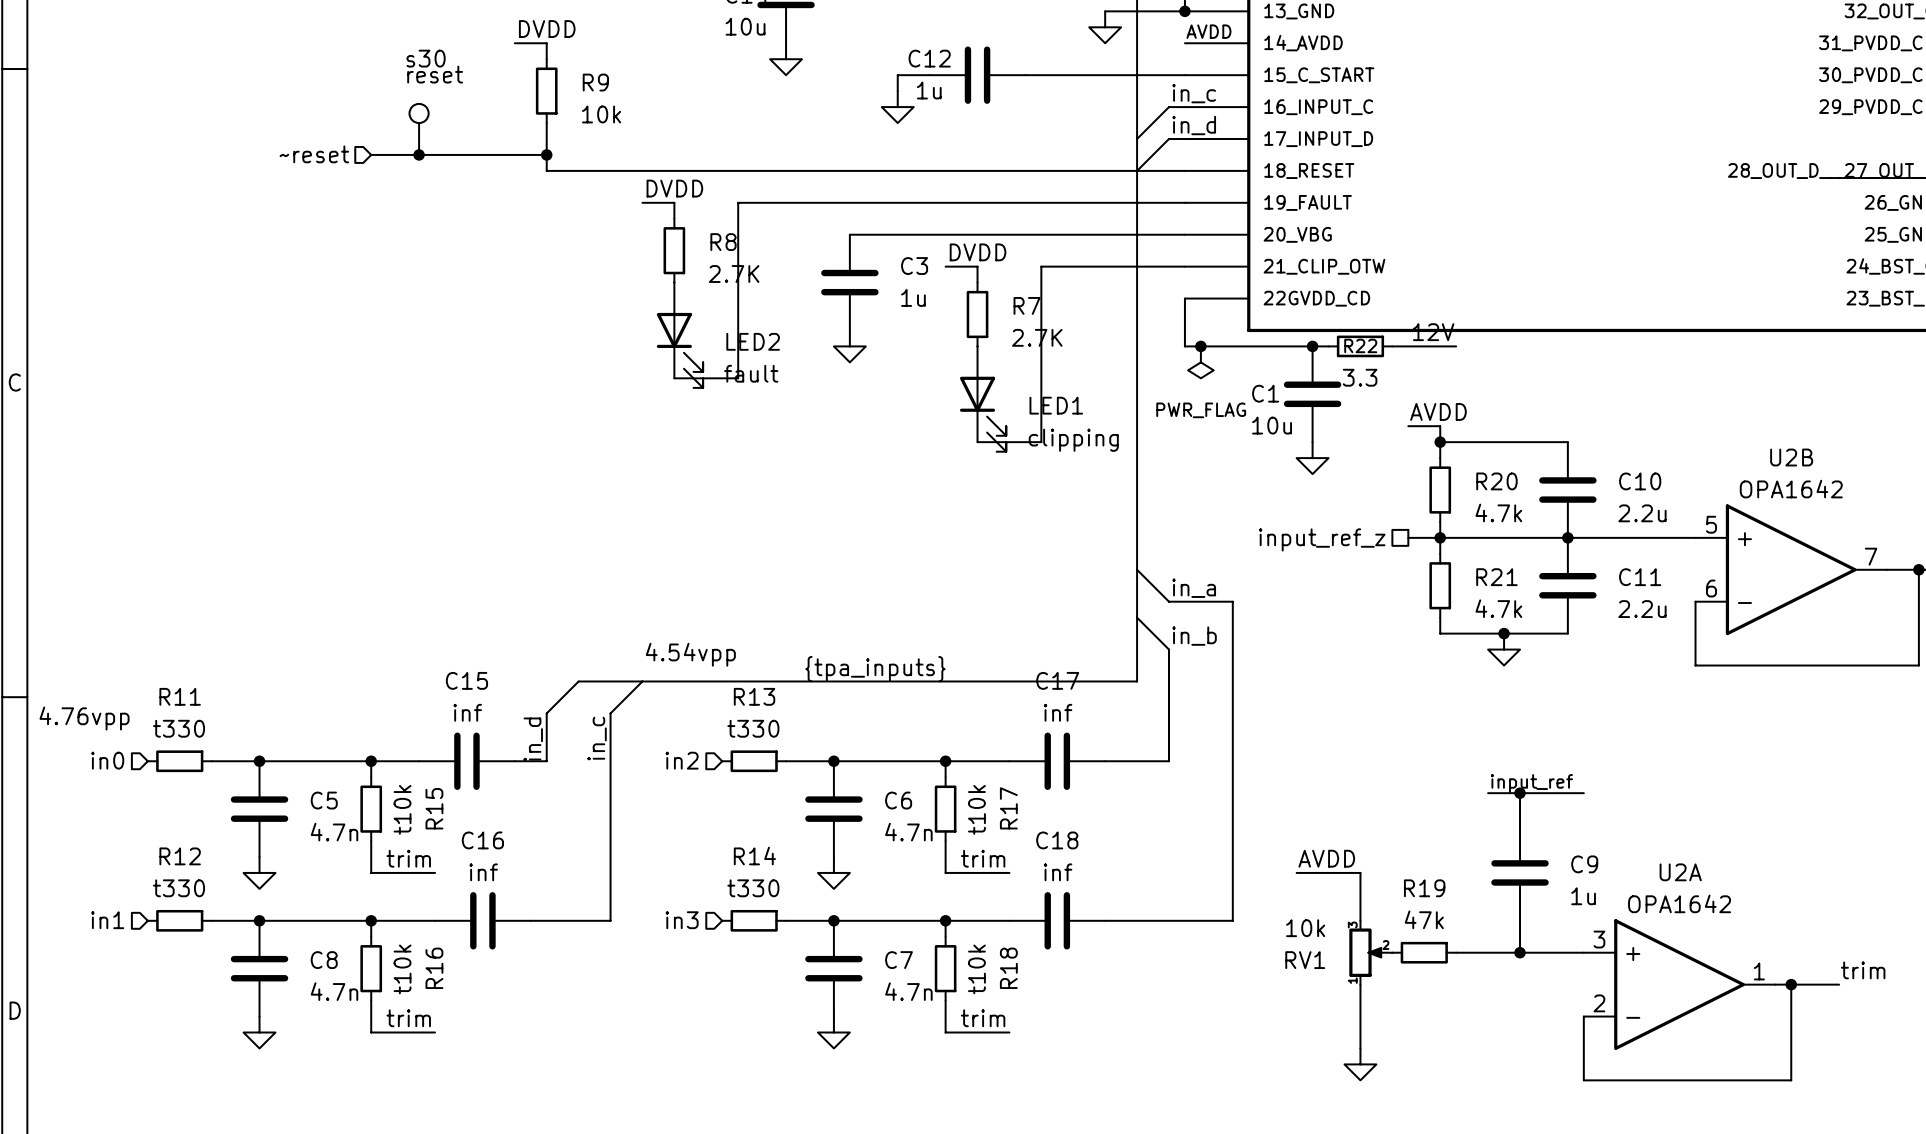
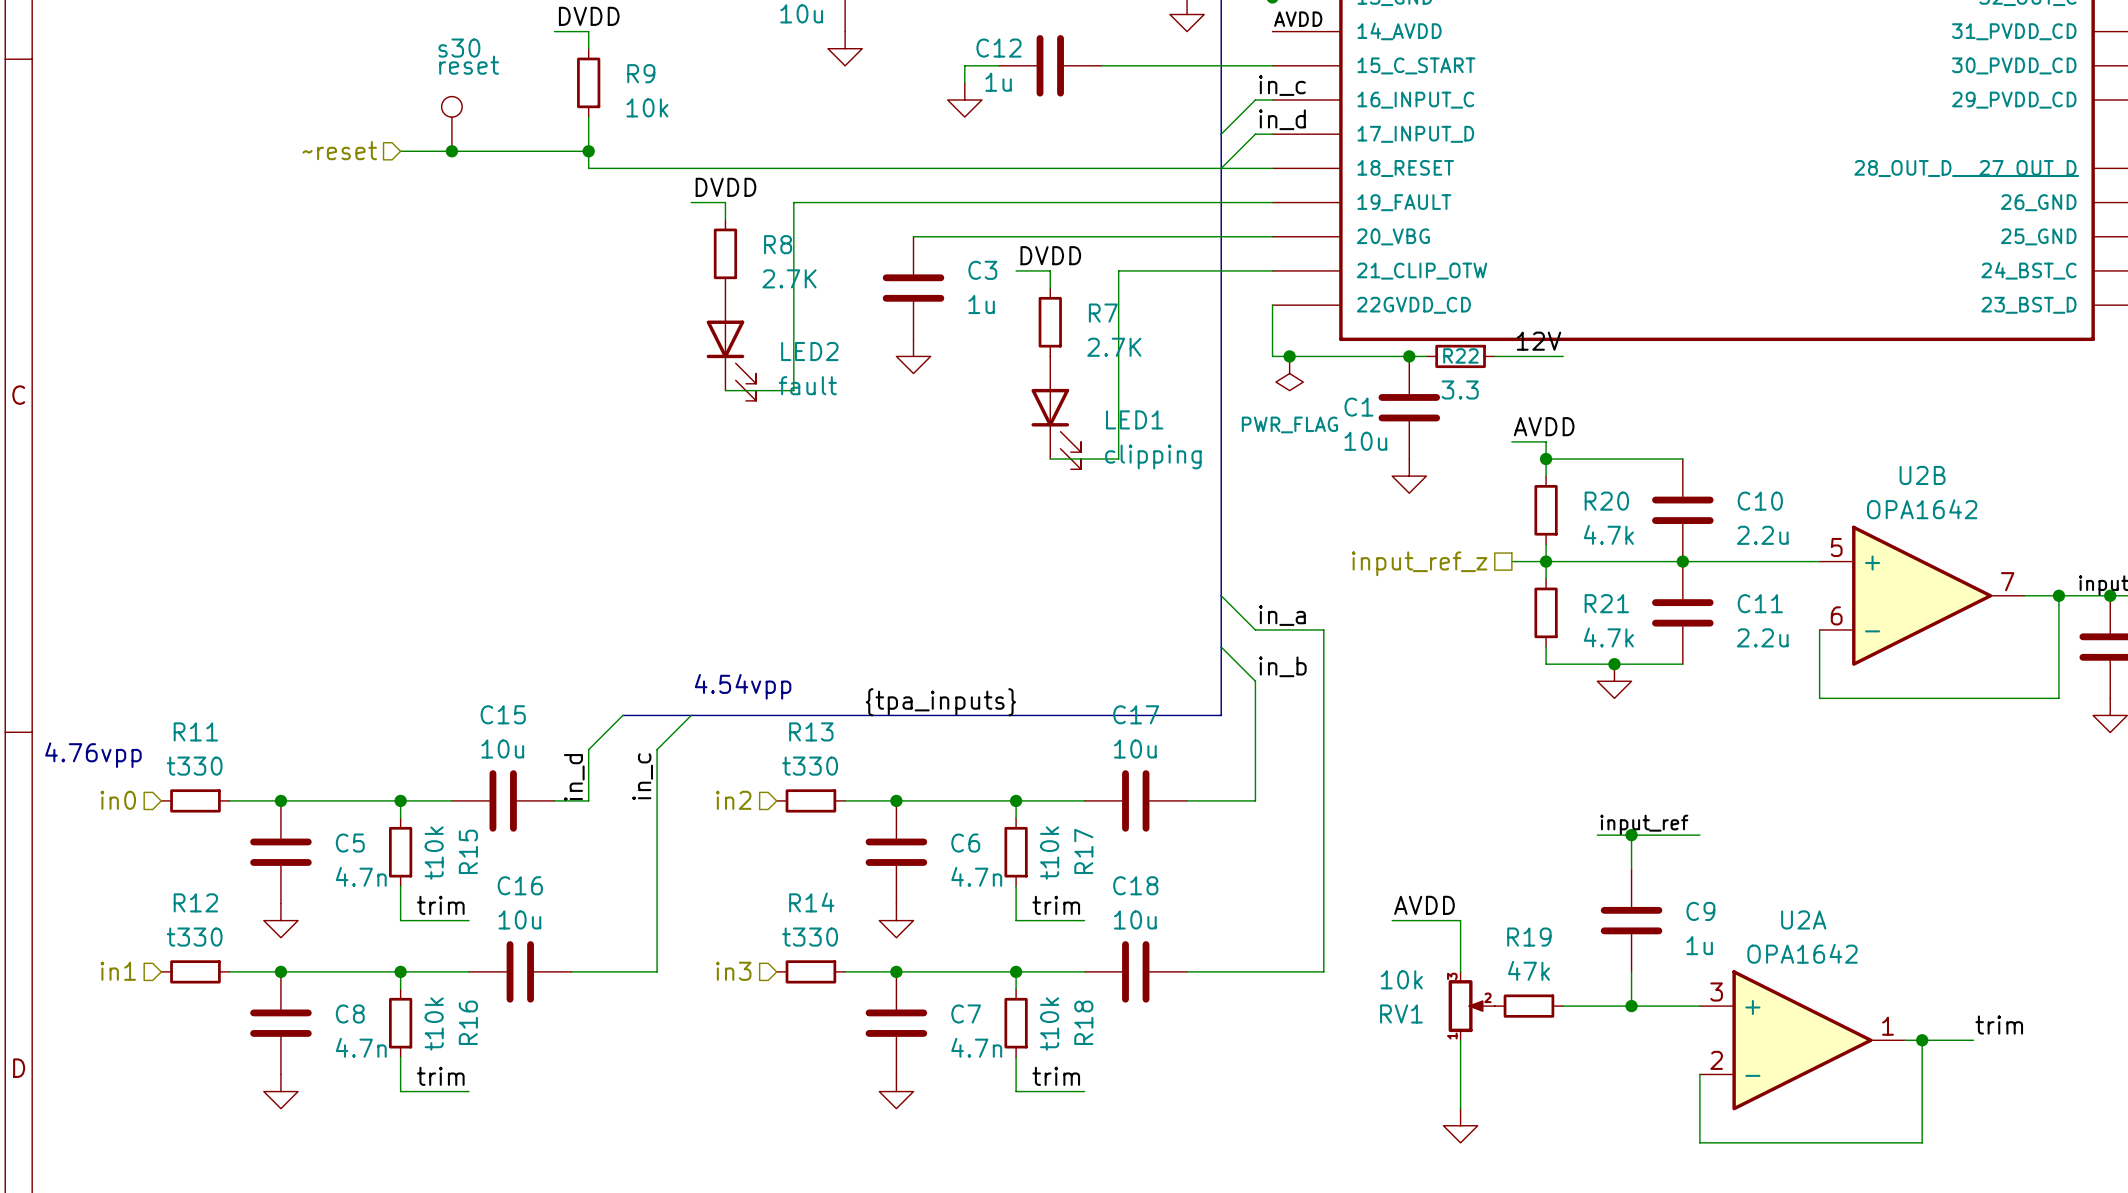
C15 value: inf (467, 712) -> 10u (502, 749)
C17 value: inf (1058, 712) -> 10u (1135, 749)
C16 value: inf (483, 872) -> 10u (519, 919)
C18 value: inf (1058, 872) -> 10u (1135, 919)

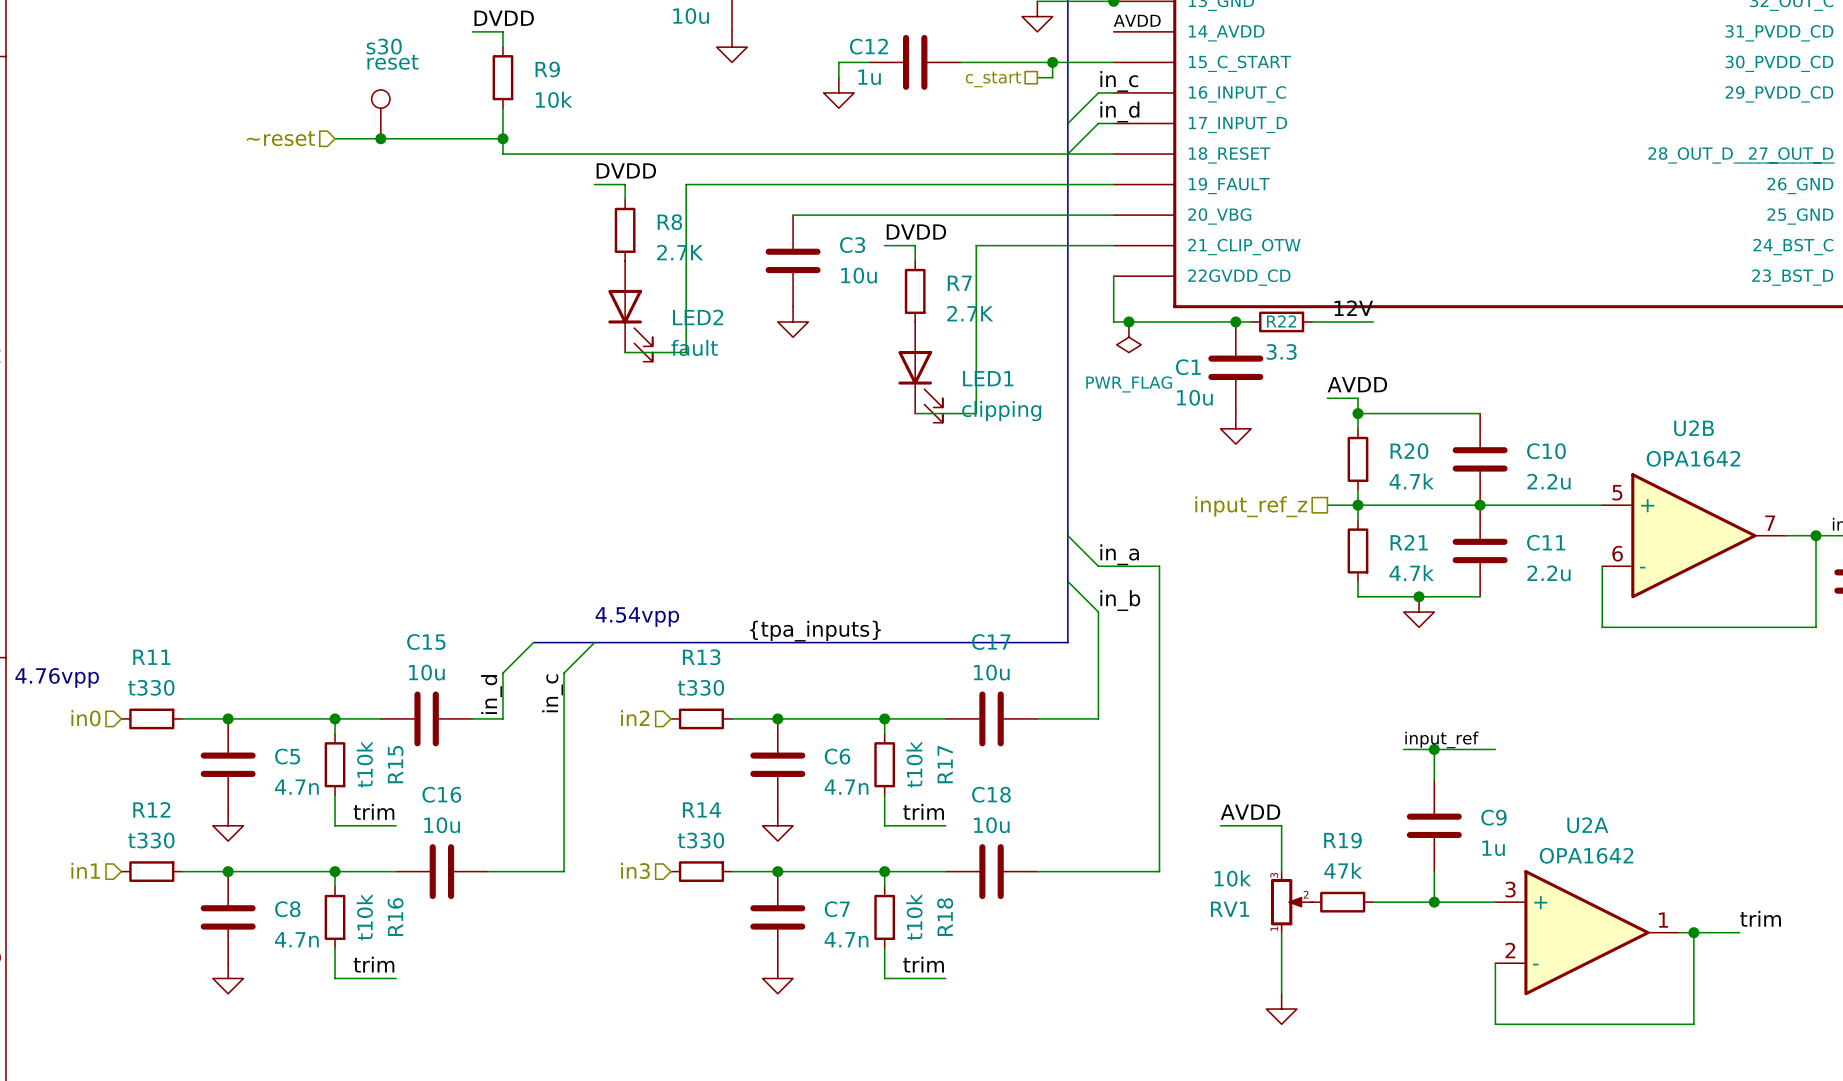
wire: none -> (1052, 62) (1052, 77) (1037, 77)
junction: none -> (1052, 62)
hierarchical label: none -> c_start (993, 79)
C3 value: 1u (981, 304) -> 10u (859, 275)

